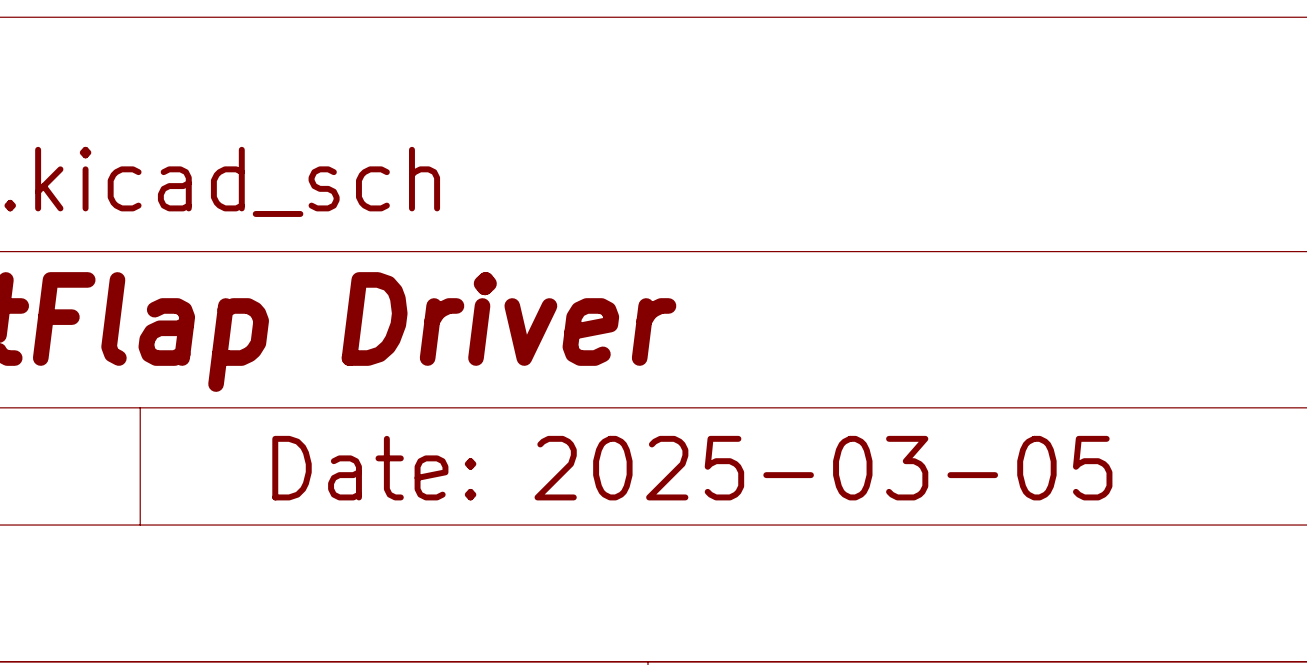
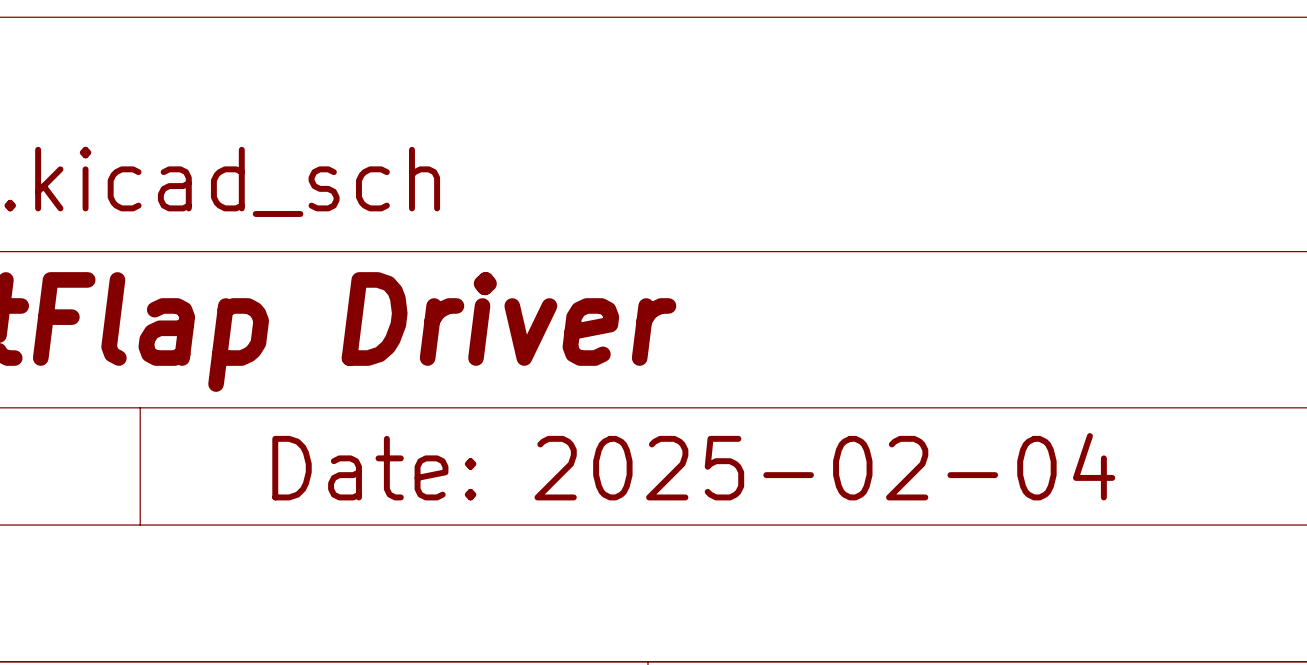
title block: Date: 2025-03-05 (692, 468) -> Date: 2025-02-04 (693, 466)

